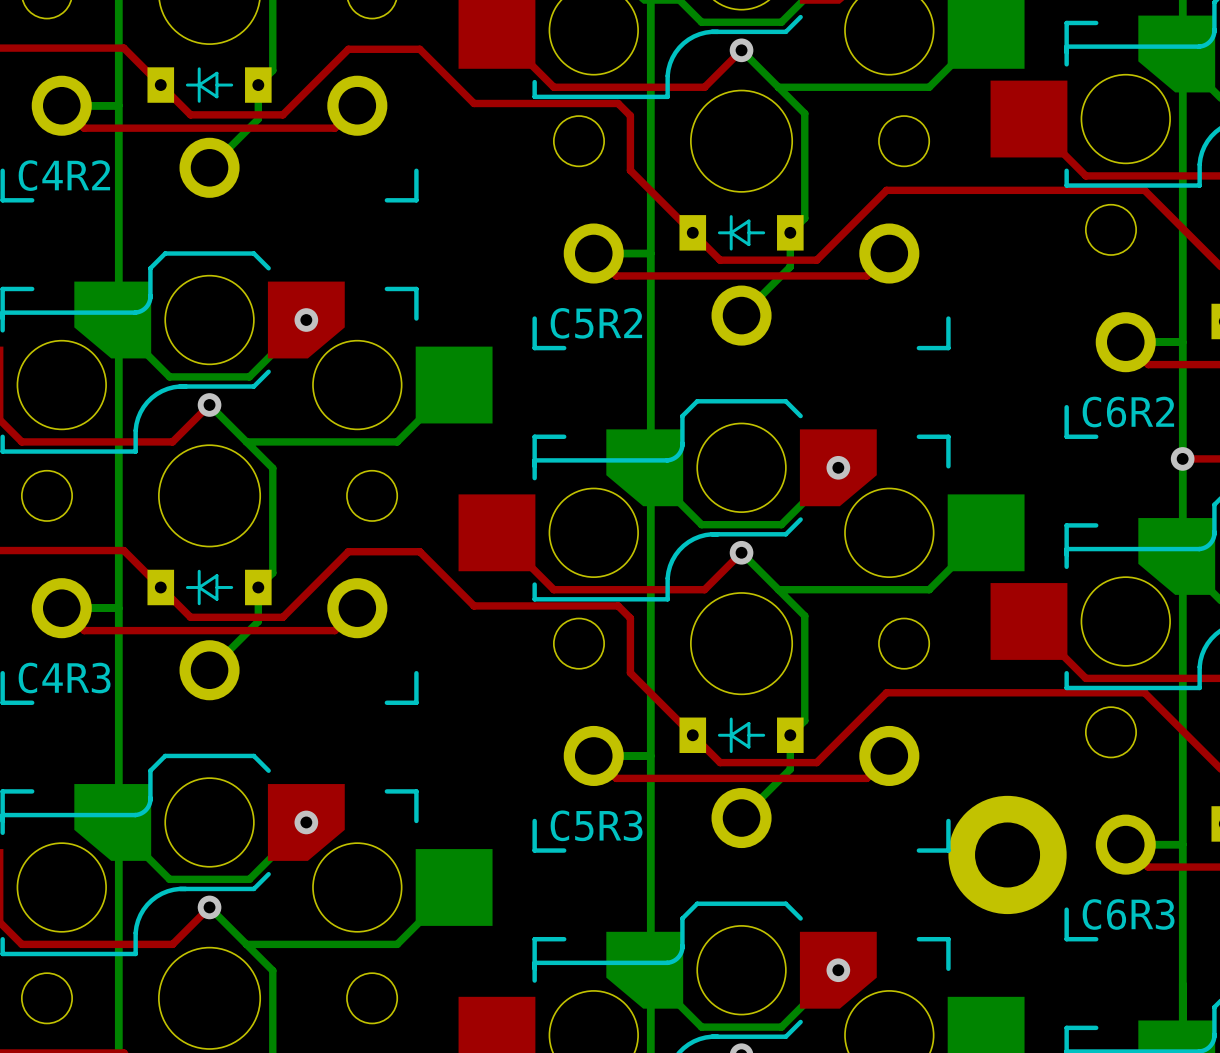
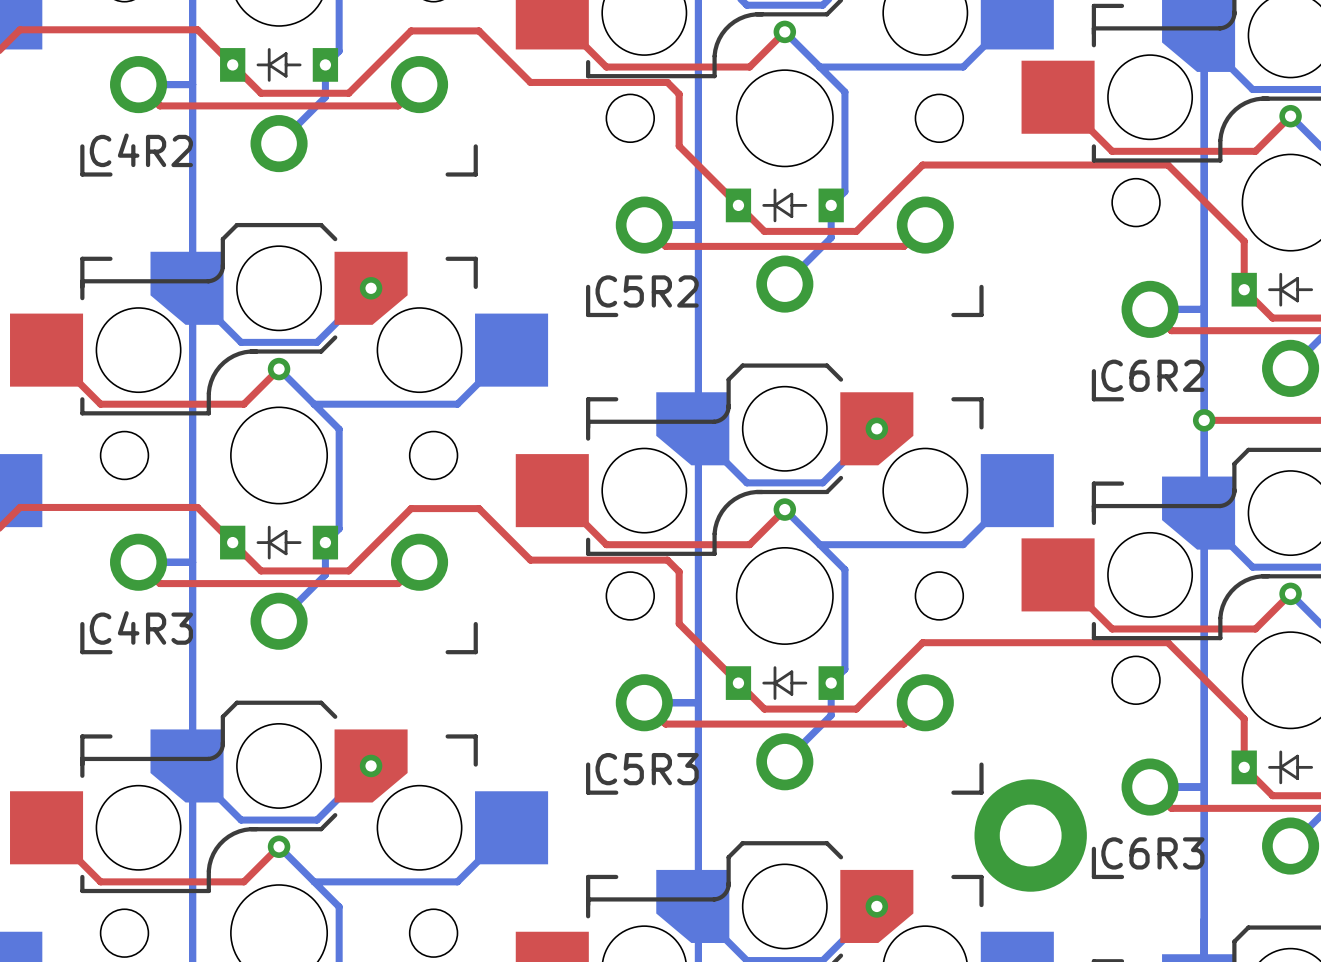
part position: (1007, 854) -> (1030, 835)

